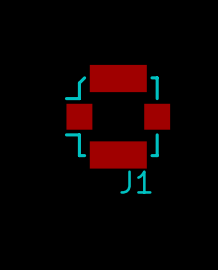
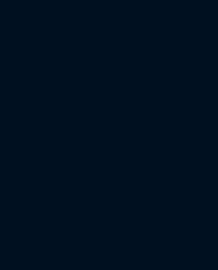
J1: (117, 116) -> none

